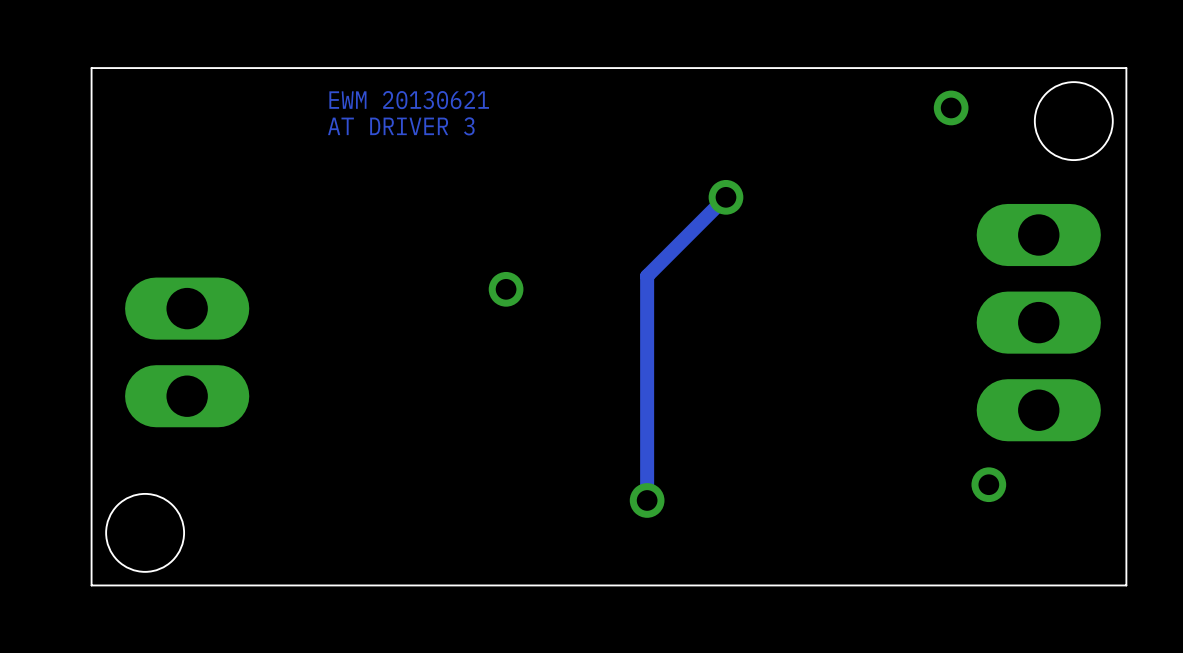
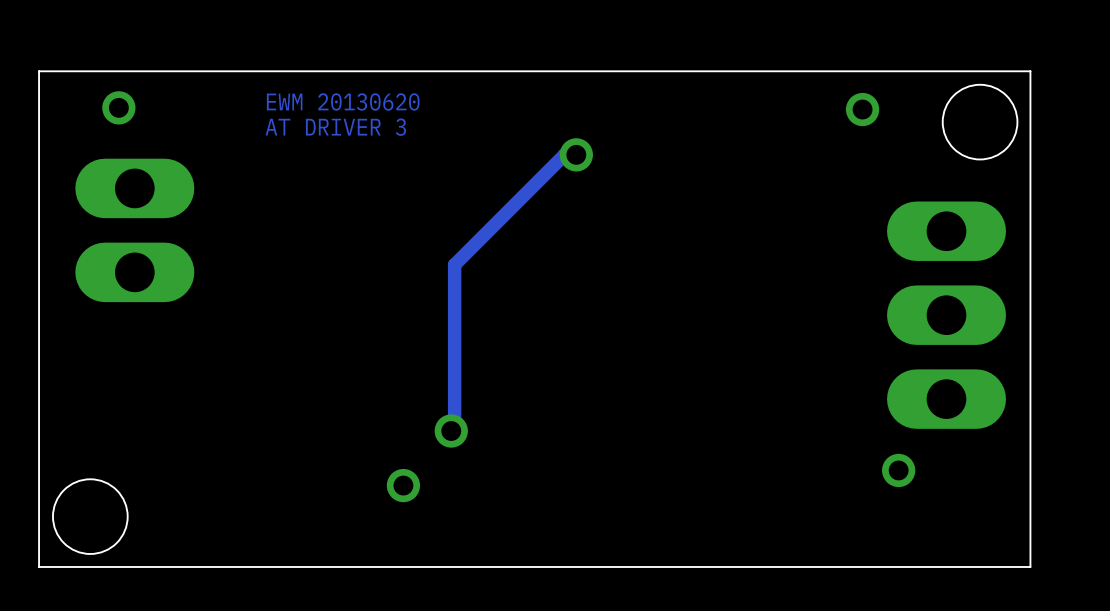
text: EWM 20130621 (409, 100) -> EWM 20130620 (343, 101)
via: none -> (118, 107)
track: none -> (576, 154) (564, 154) (454, 264) (454, 427) (451, 431)
track: (725, 197) (647, 276) (647, 500) -> none
via position: (725, 197) -> (576, 154)
via: (506, 289) -> none
part position: (187, 352) -> (134, 230)
via: none -> (451, 431)
via: none -> (403, 485)
via: (647, 500) -> none

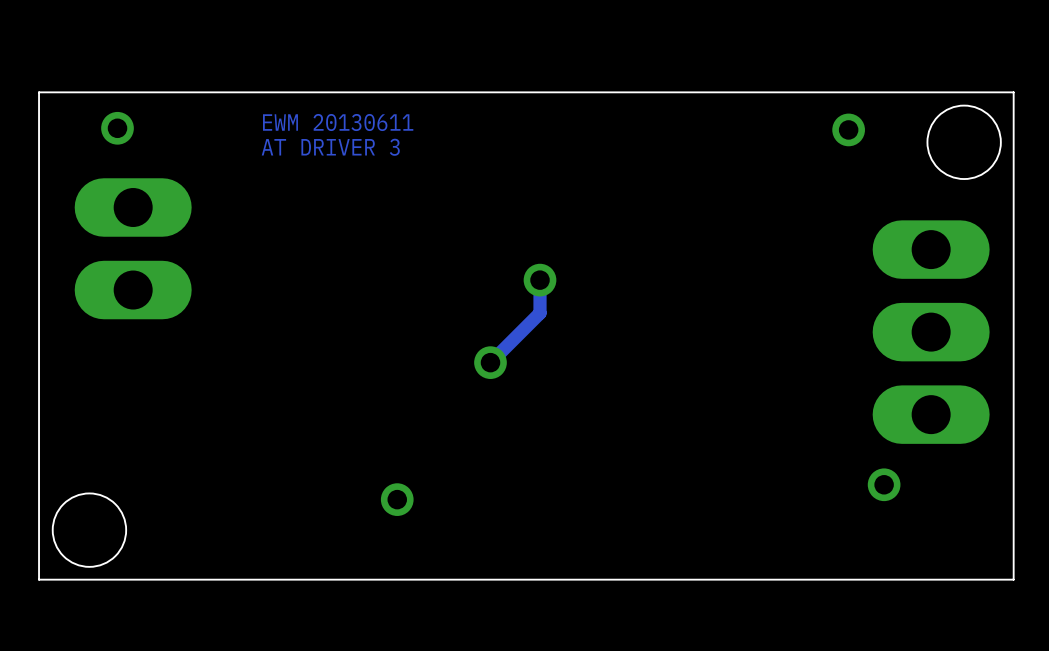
text: EWM 20130620 (343, 101) -> EWM 20130611 (338, 122)
track: (576, 154) (564, 154) (454, 264) (454, 427) (451, 431) -> none
via: (576, 154) -> none
track: none -> (540, 280) (540, 313) (490, 362)
via: none -> (540, 280)
via position: (451, 431) -> (490, 362)

